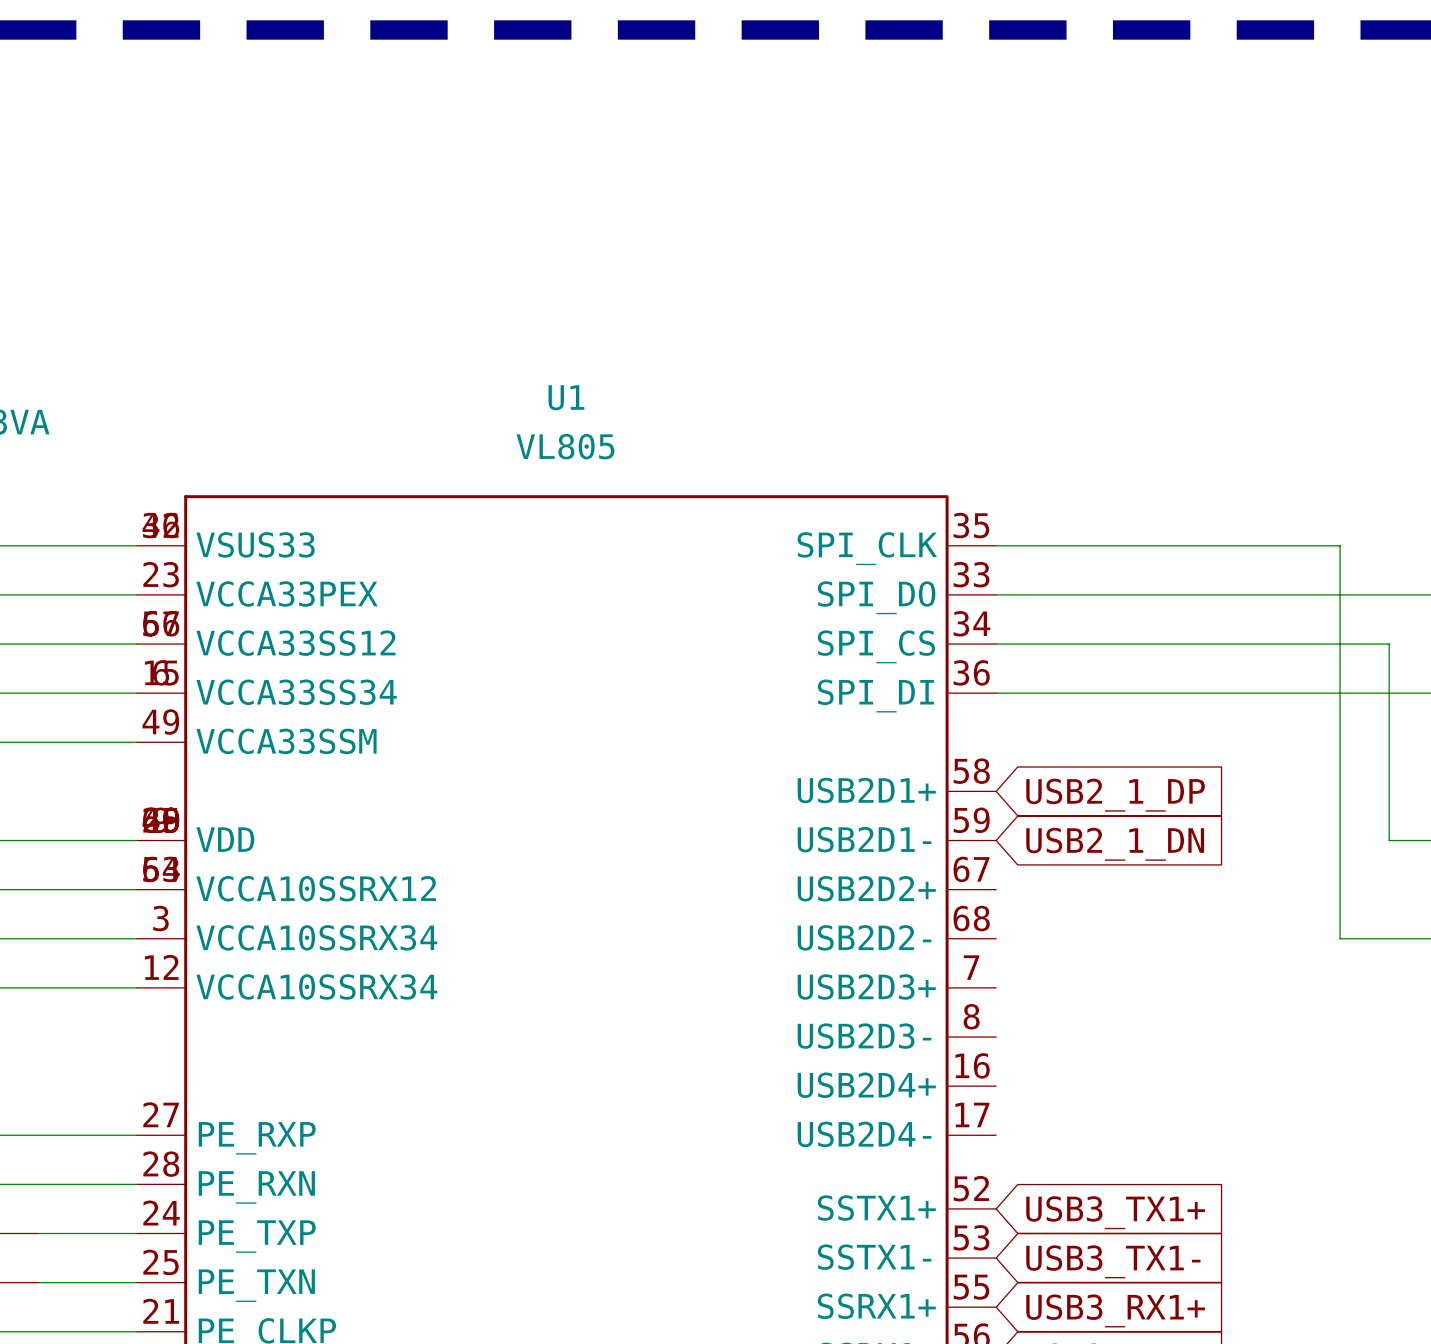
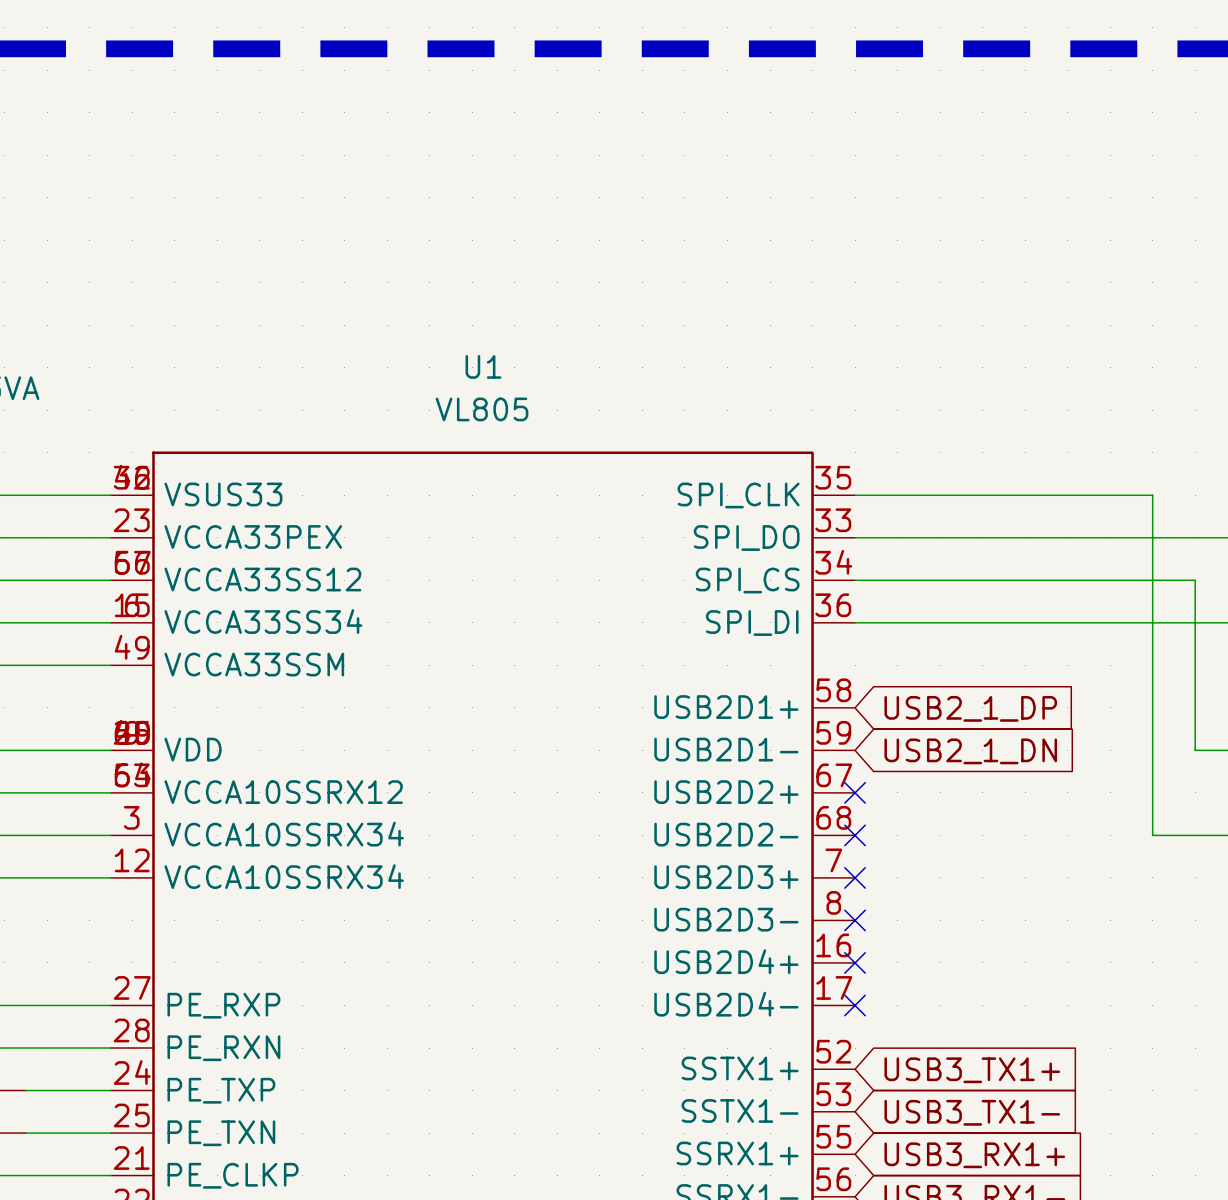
no-connect mark: none -> (855, 792)
no-connect mark: none -> (855, 835)
no-connect mark: none -> (855, 877)
no-connect mark: none -> (855, 920)
no-connect mark: none -> (855, 962)
no-connect mark: none -> (855, 1005)

